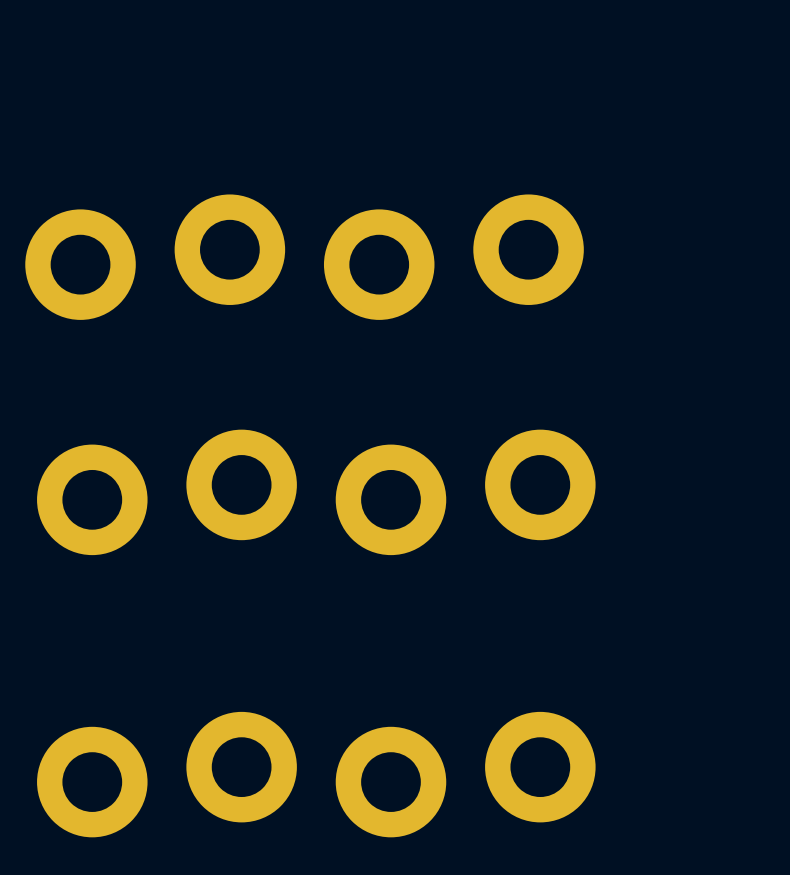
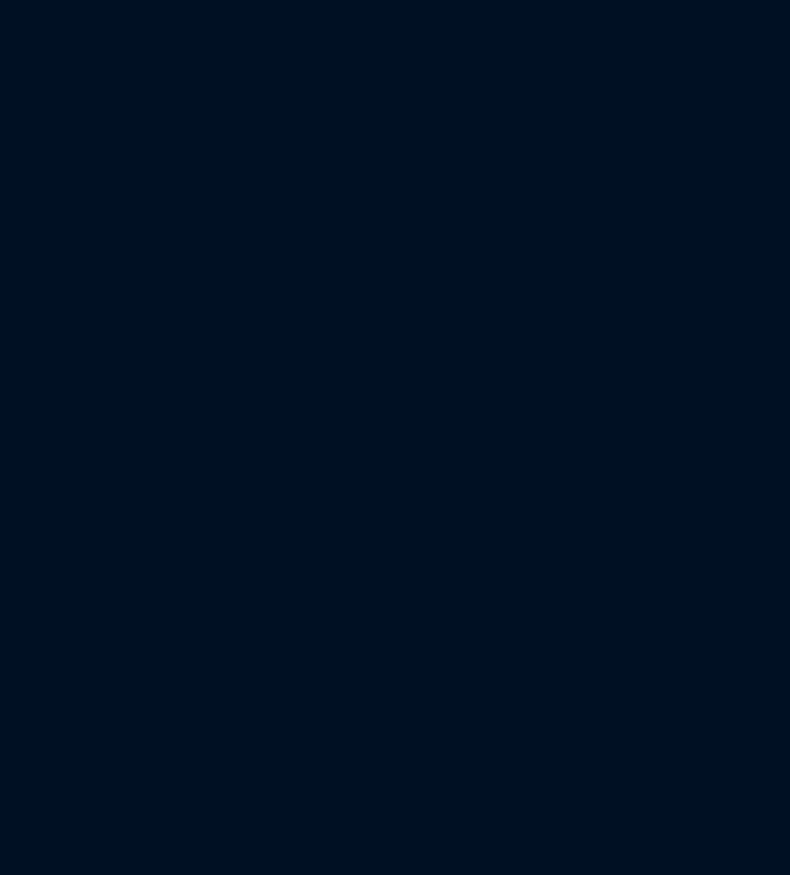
part: (304, 257) -> none
part: (316, 492) -> none
part: (316, 774) -> none

